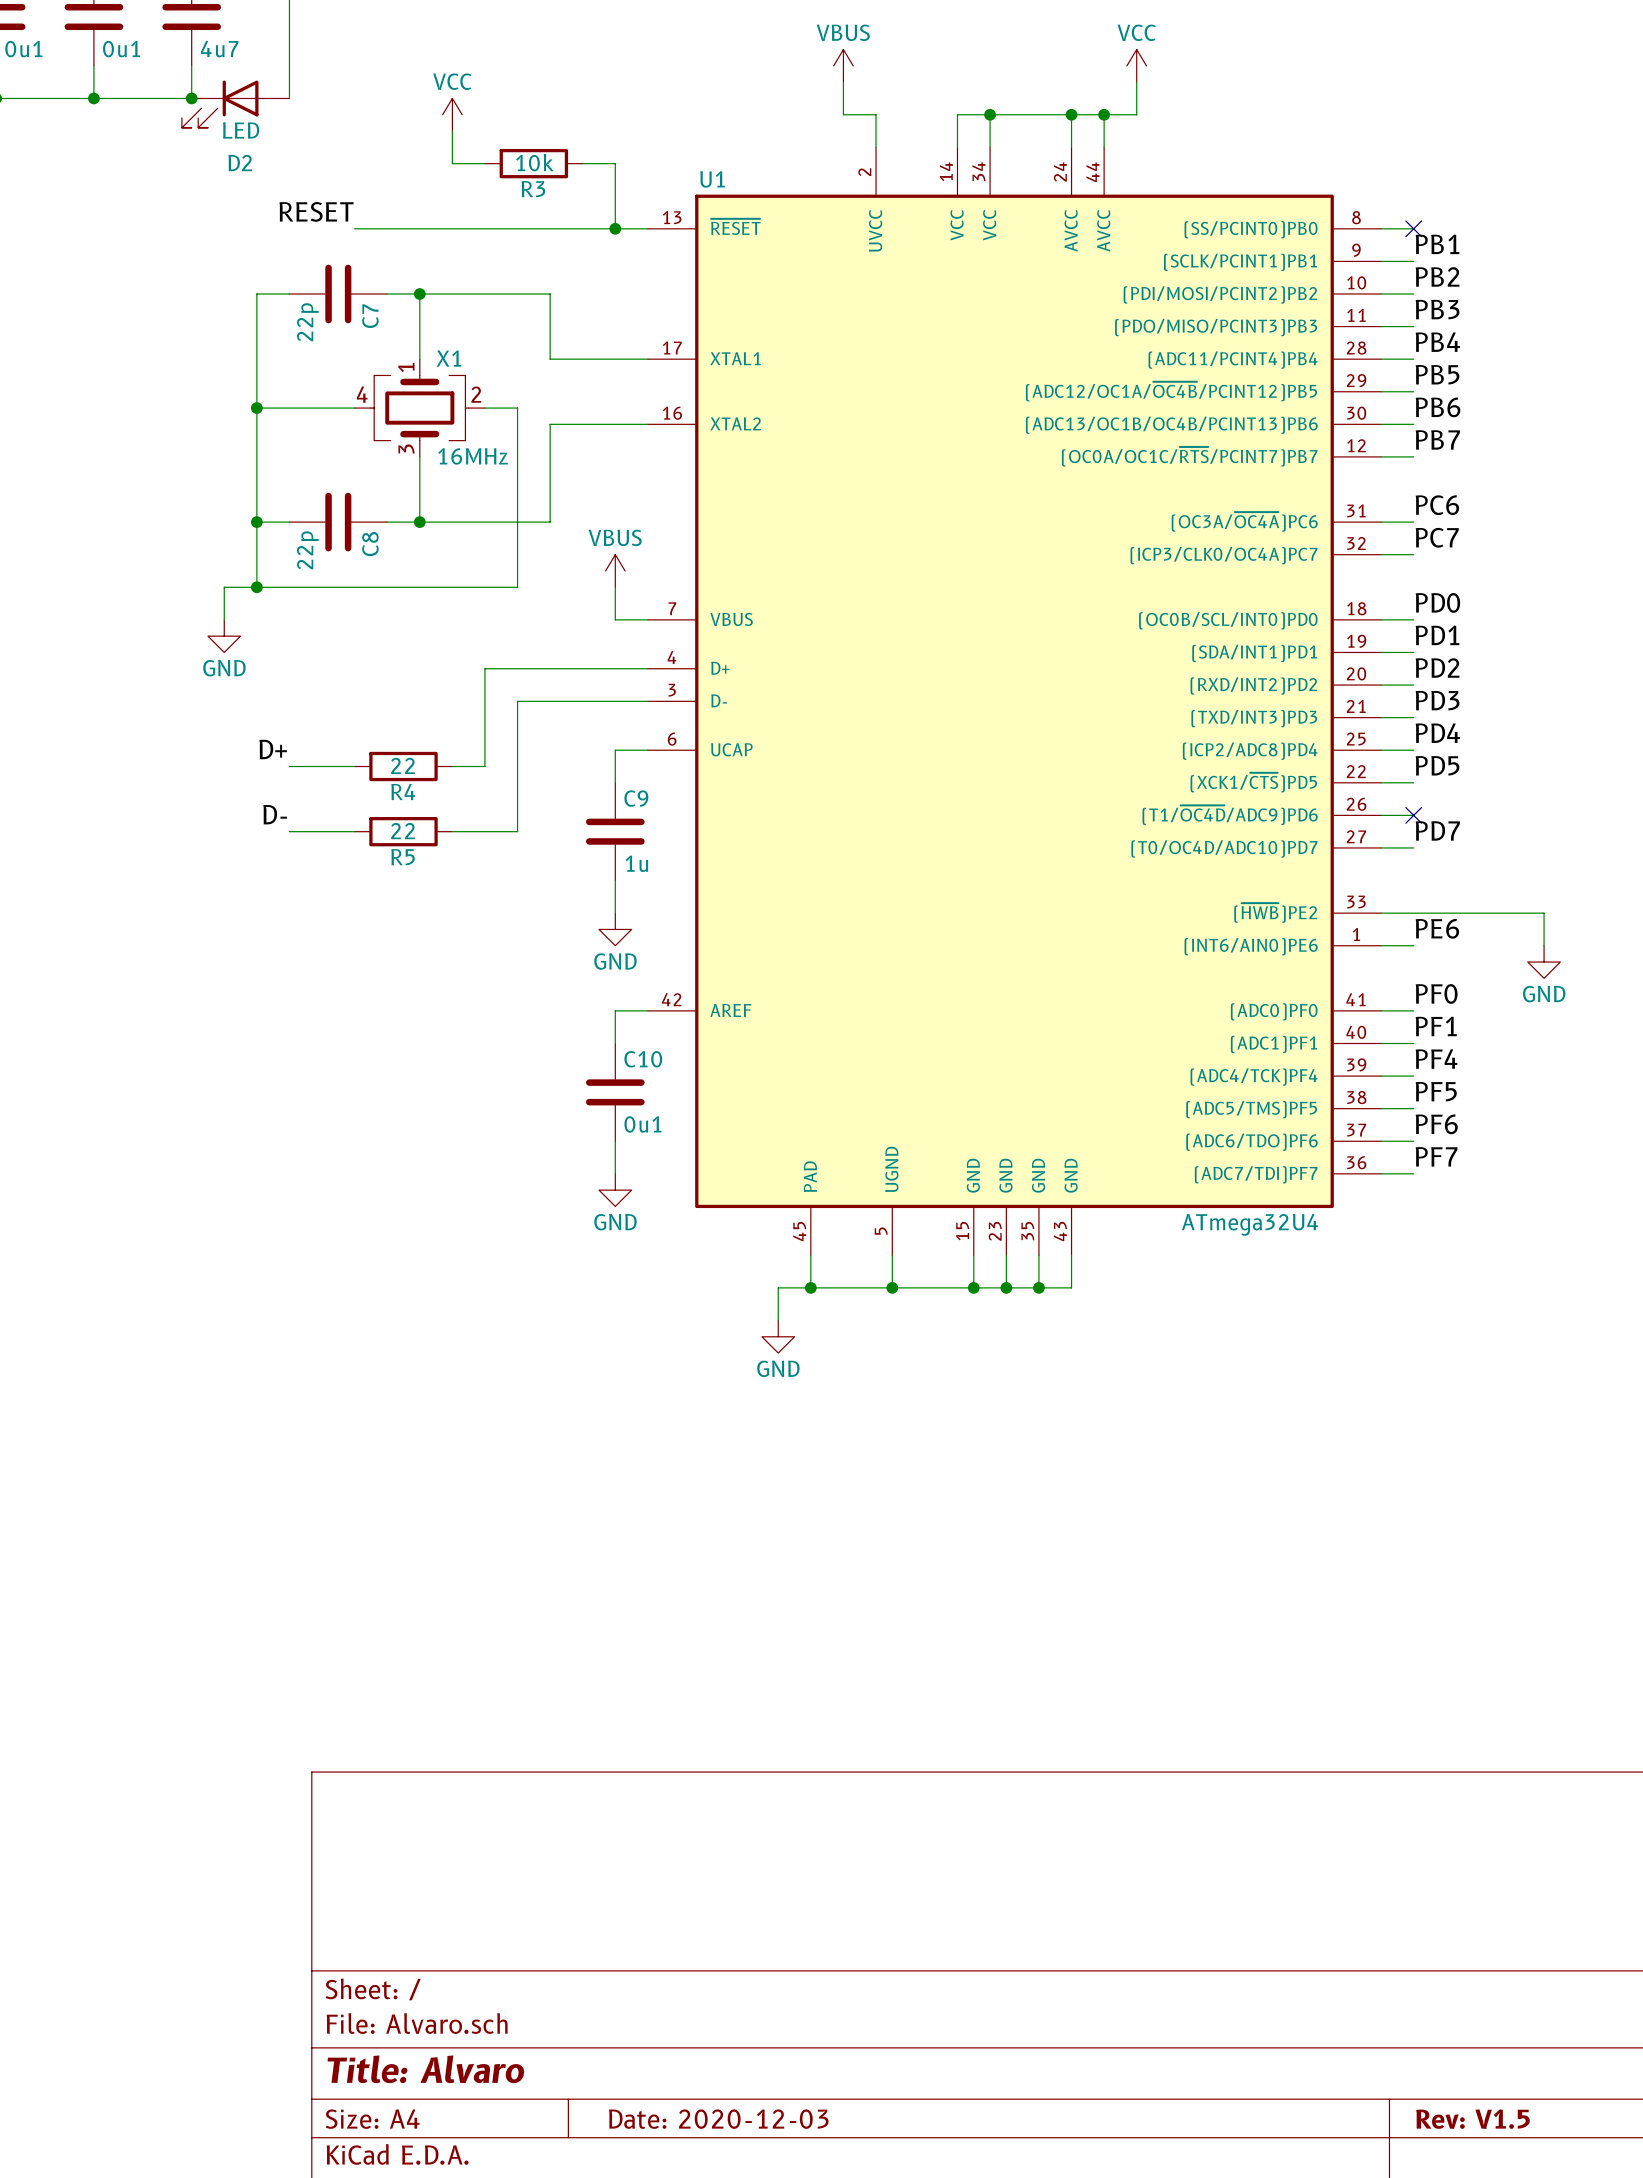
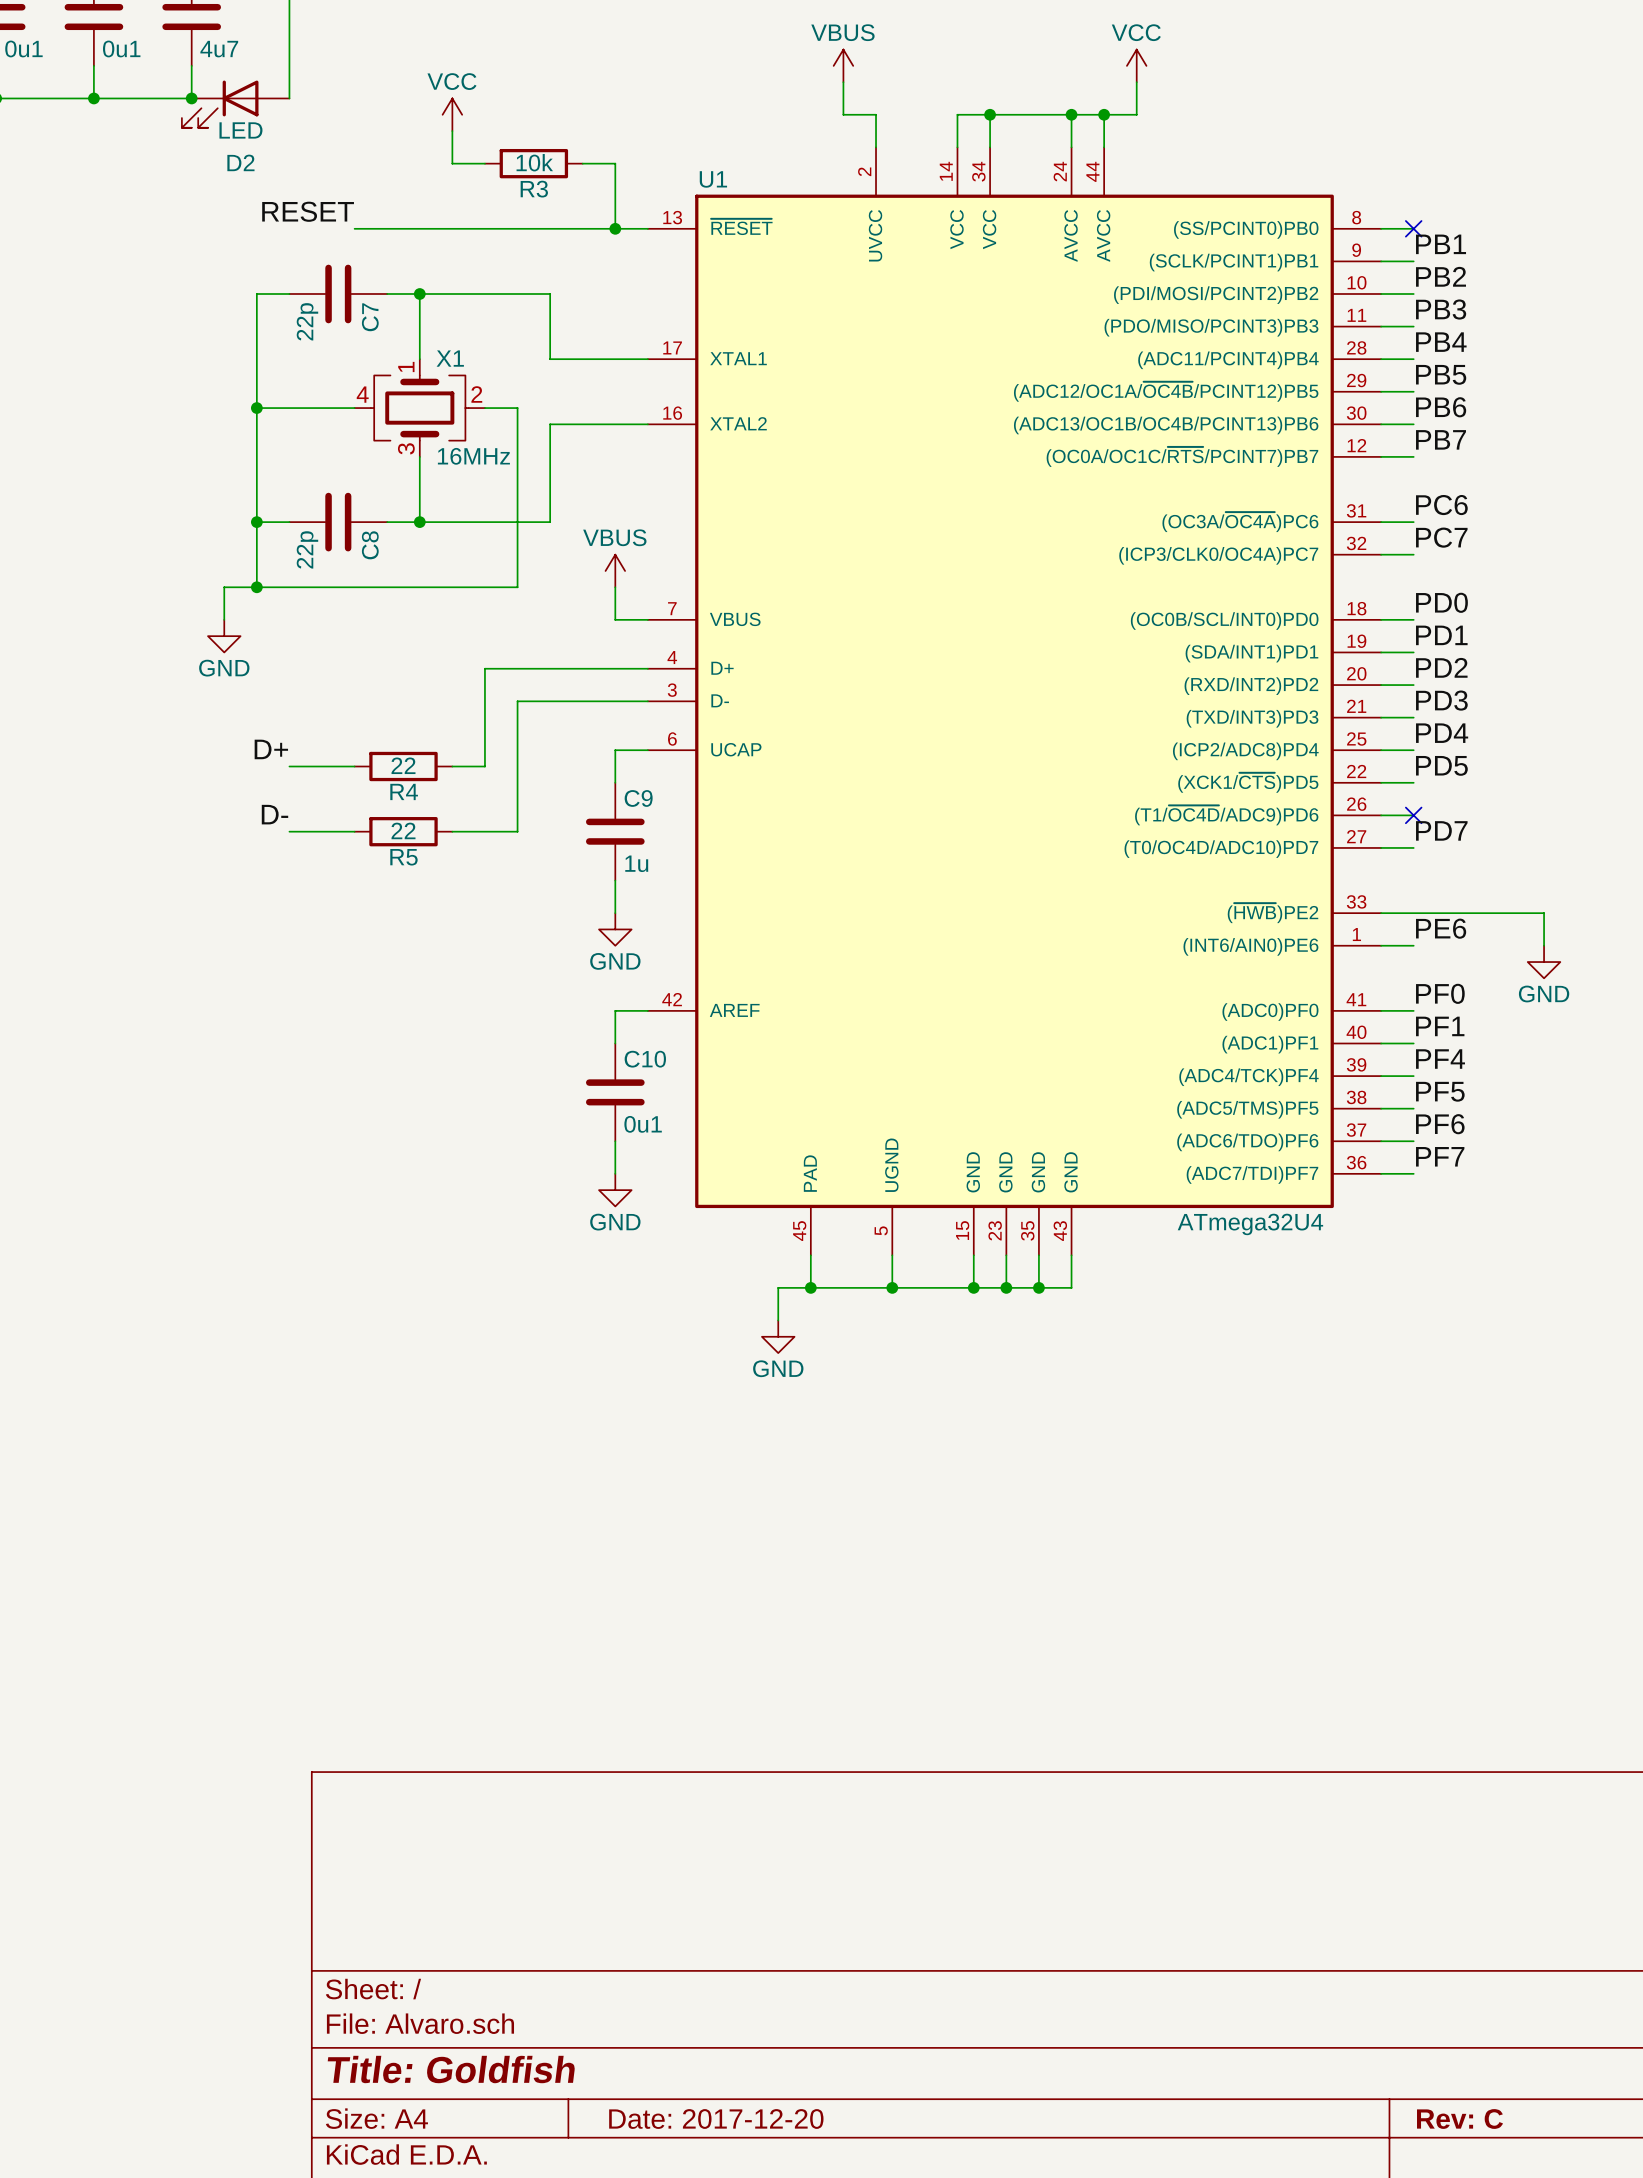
title block: Title: Alvaro (425, 2069) -> Title: Goldfish (451, 2069)
title block: Date: 2020-12-03 (718, 2119) -> Date: 2017-12-20 (716, 2119)
title block: Rev: V1.5 (1473, 2119) -> Rev: C (1459, 2119)

